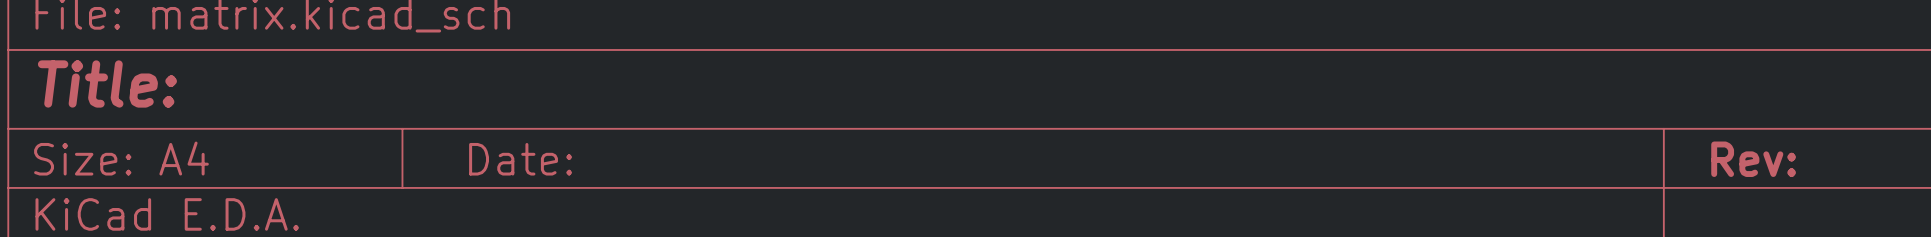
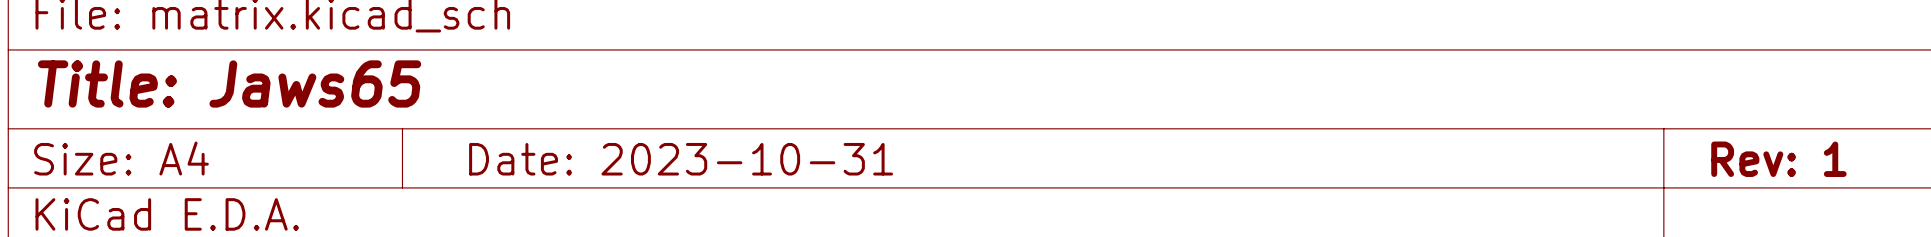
title block: Title: (107, 83) -> Title: Jaws65 (229, 83)
title block: Date: (520, 159) -> Date: 2023-10-31 (681, 159)
title block: Rev: (1753, 159) -> Rev: 1 (1778, 159)

